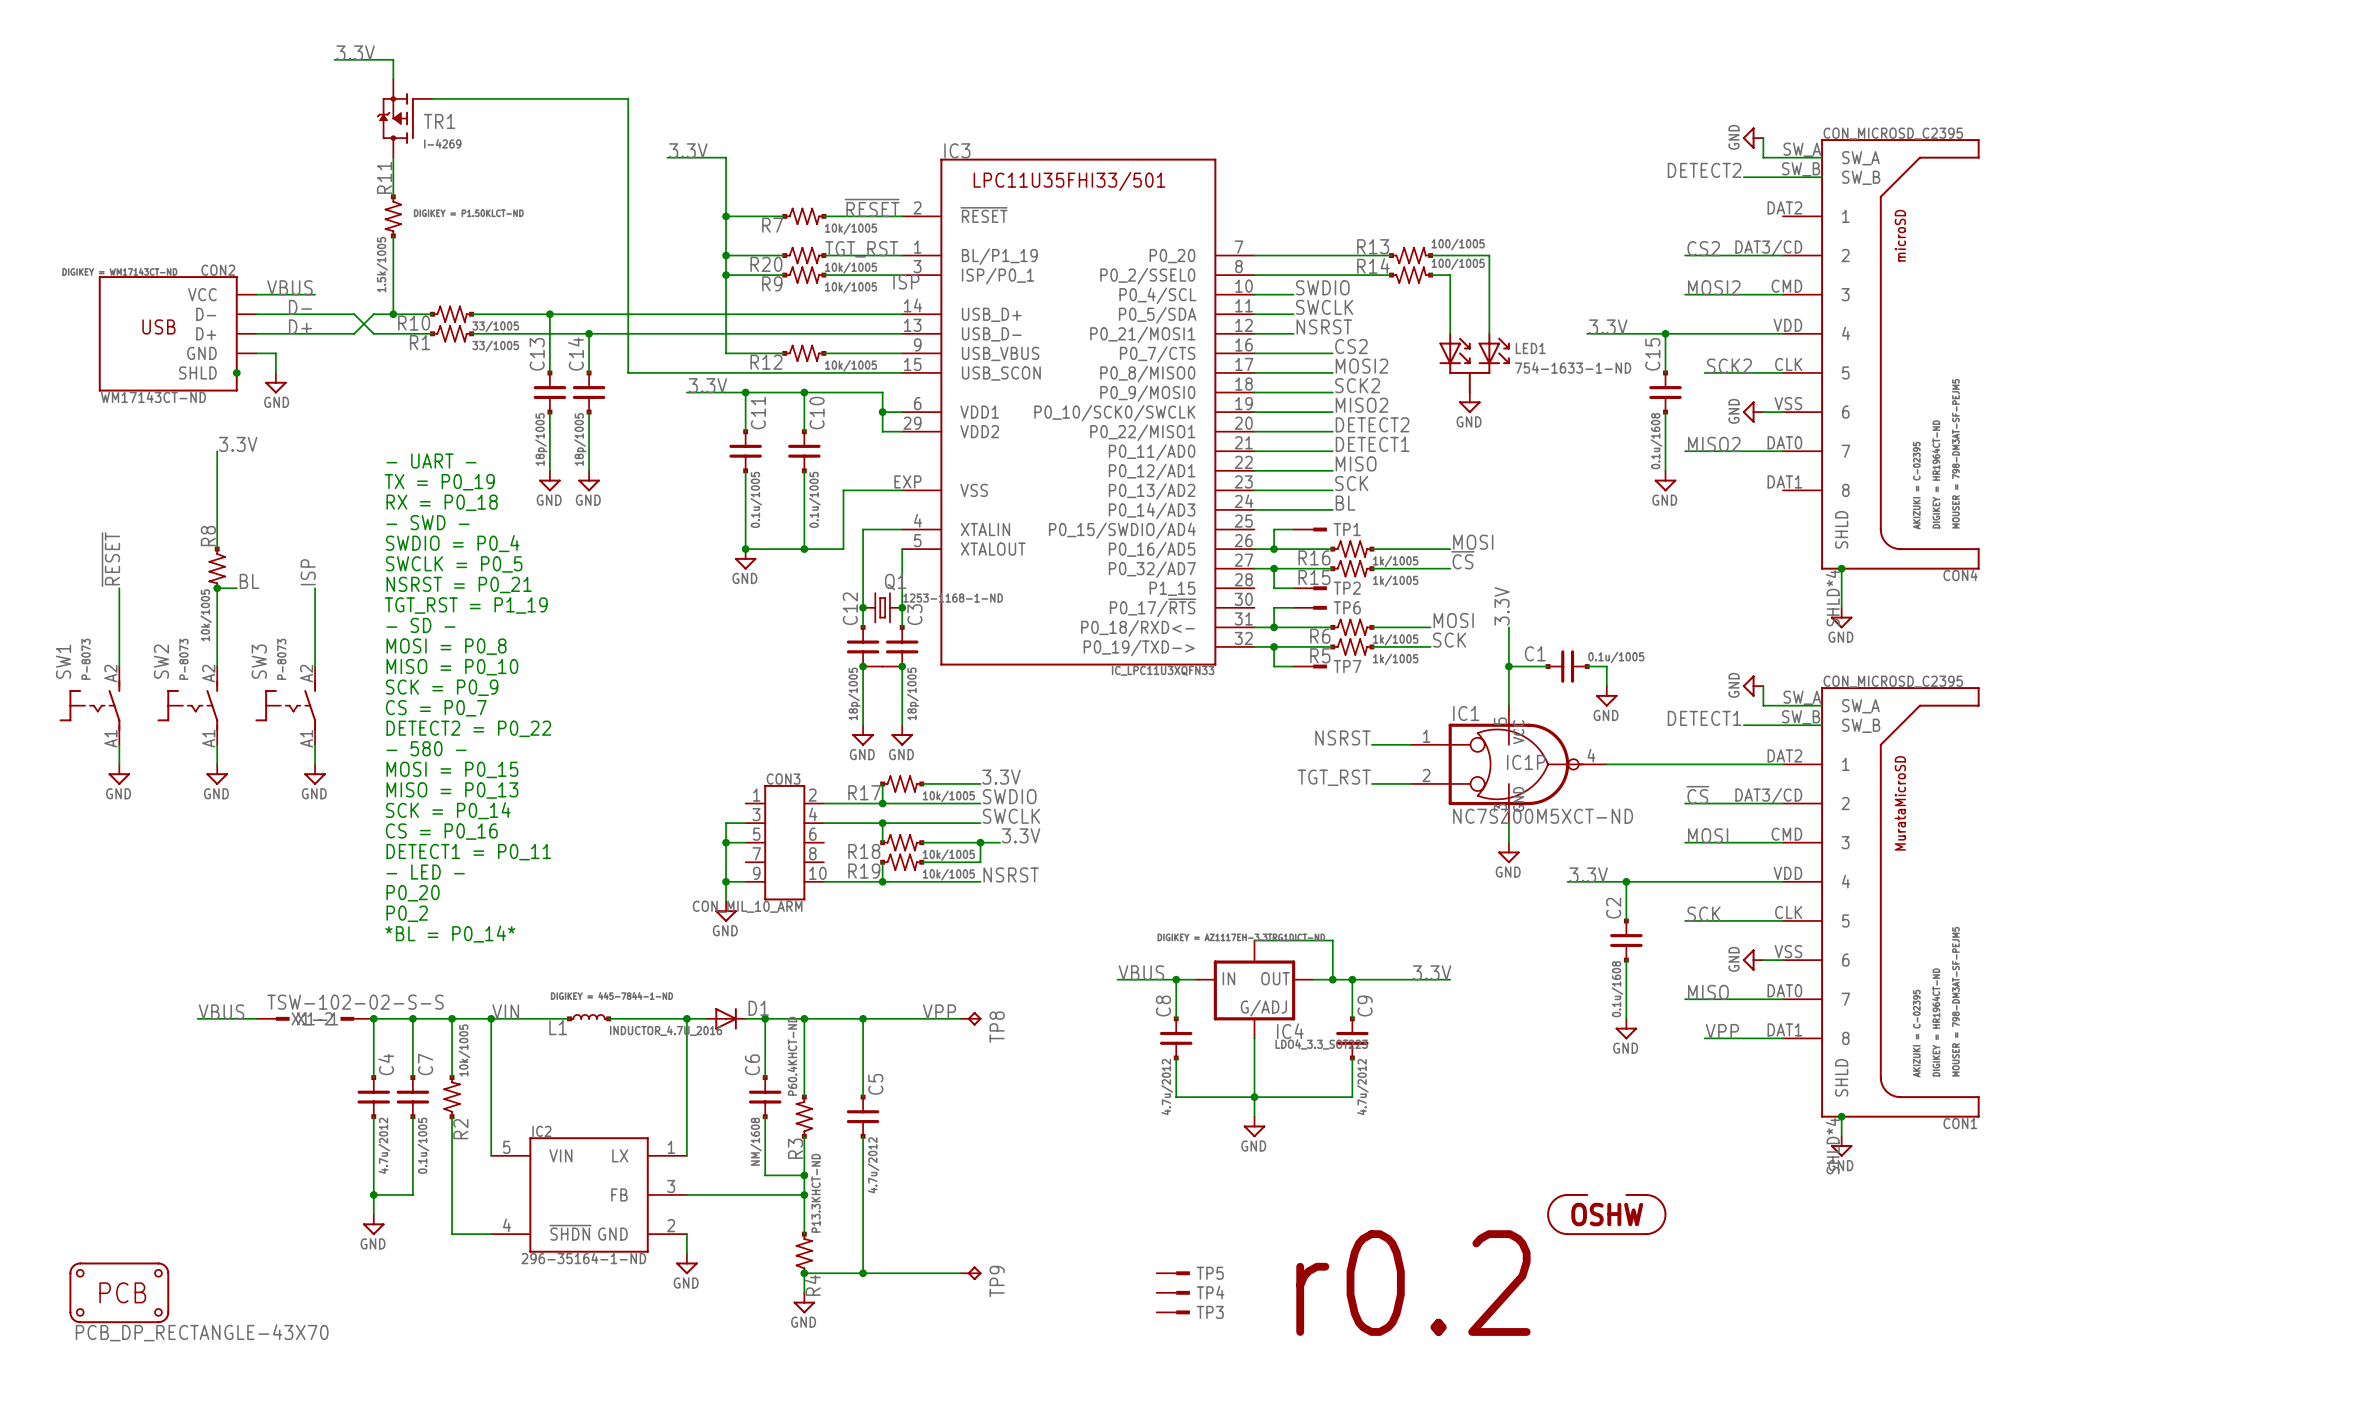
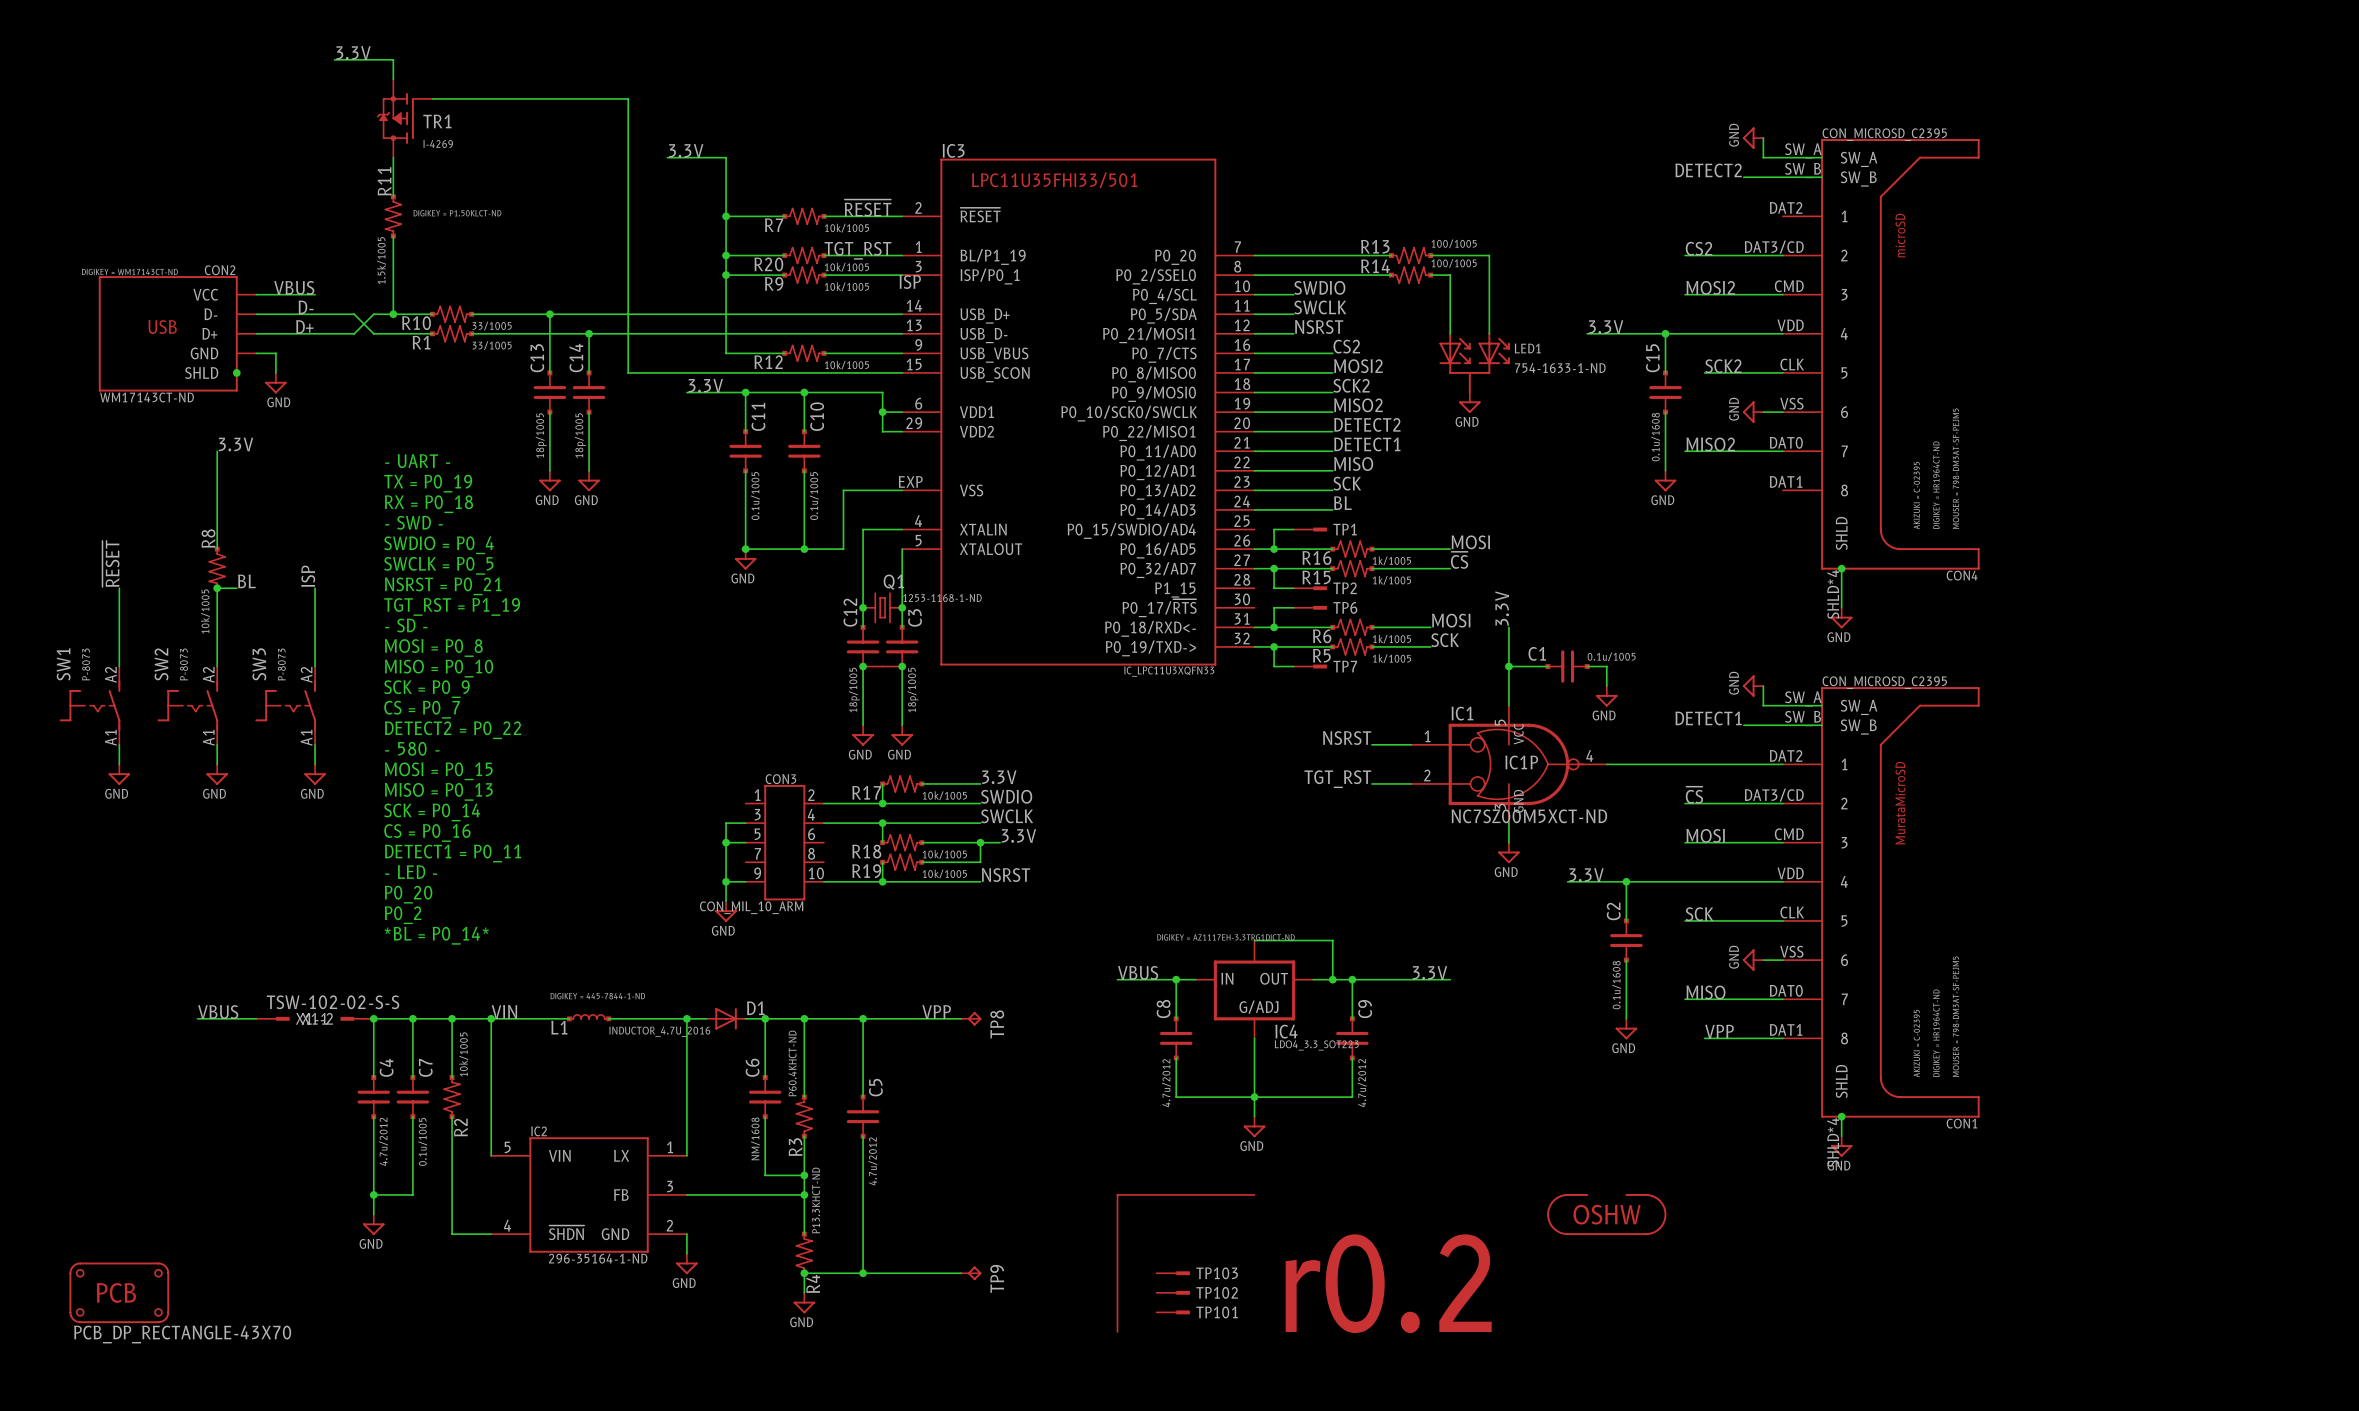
line: none -> (1254, 1194) (1117, 1194) (1117, 1331)
TP5 name: TP5 (1210, 1273) -> TP103 (1217, 1273)
TP4 name: TP4 (1210, 1292) -> TP102 (1217, 1292)
TP3 name: TP3 (1210, 1312) -> TP101 (1217, 1312)

